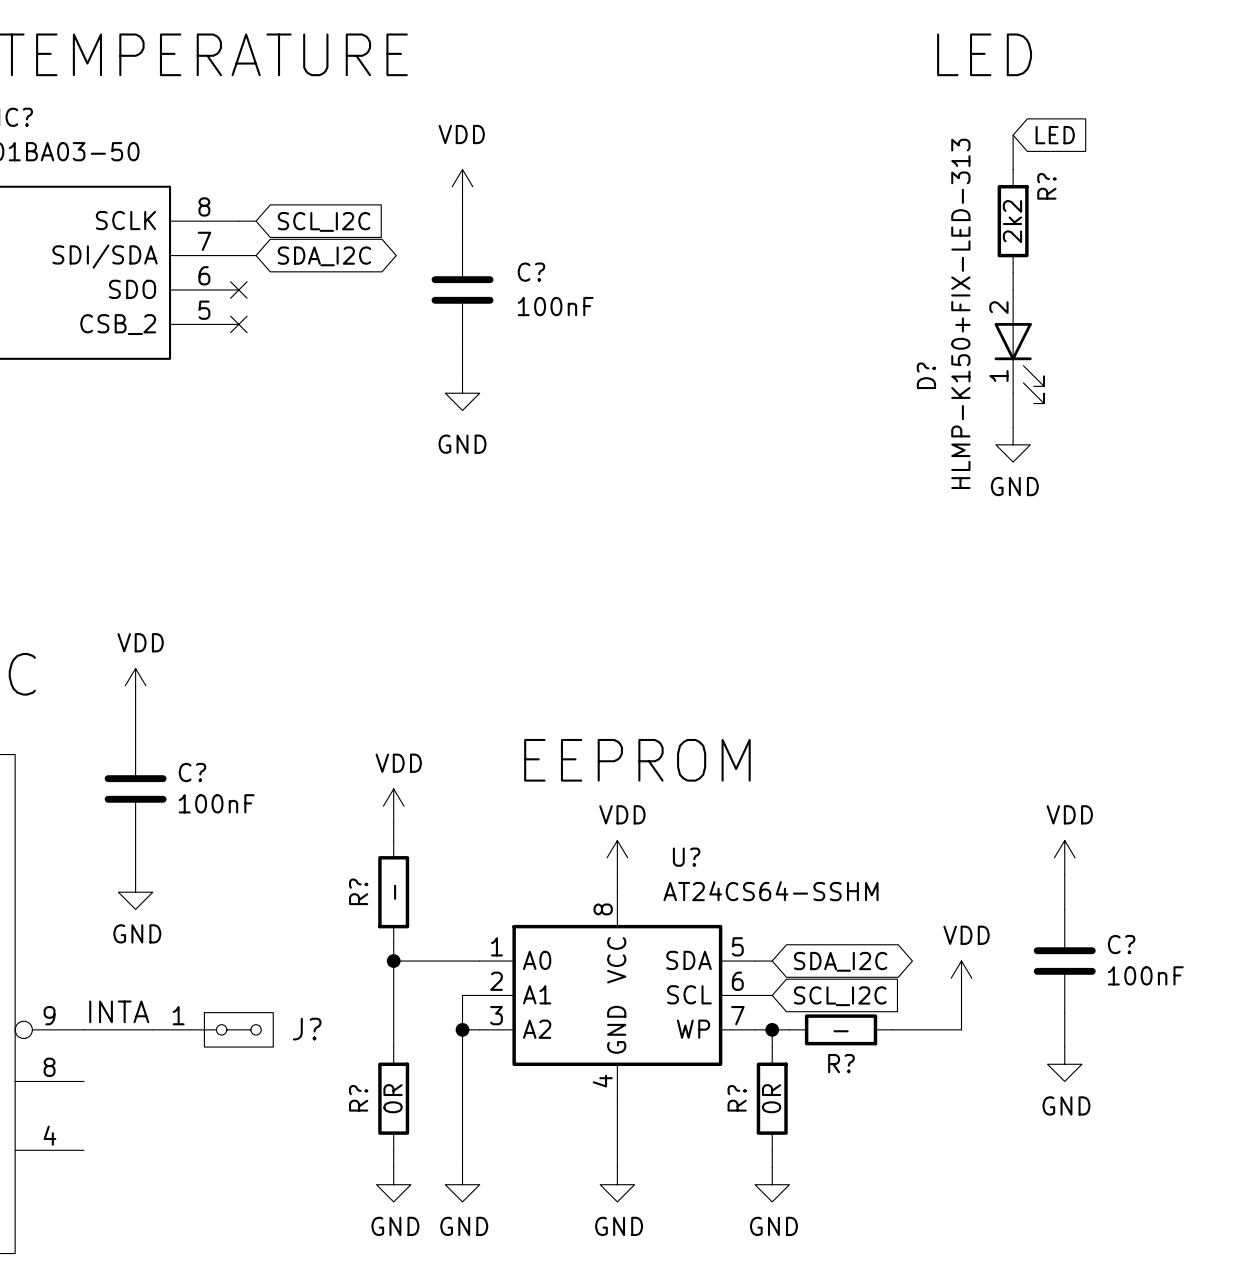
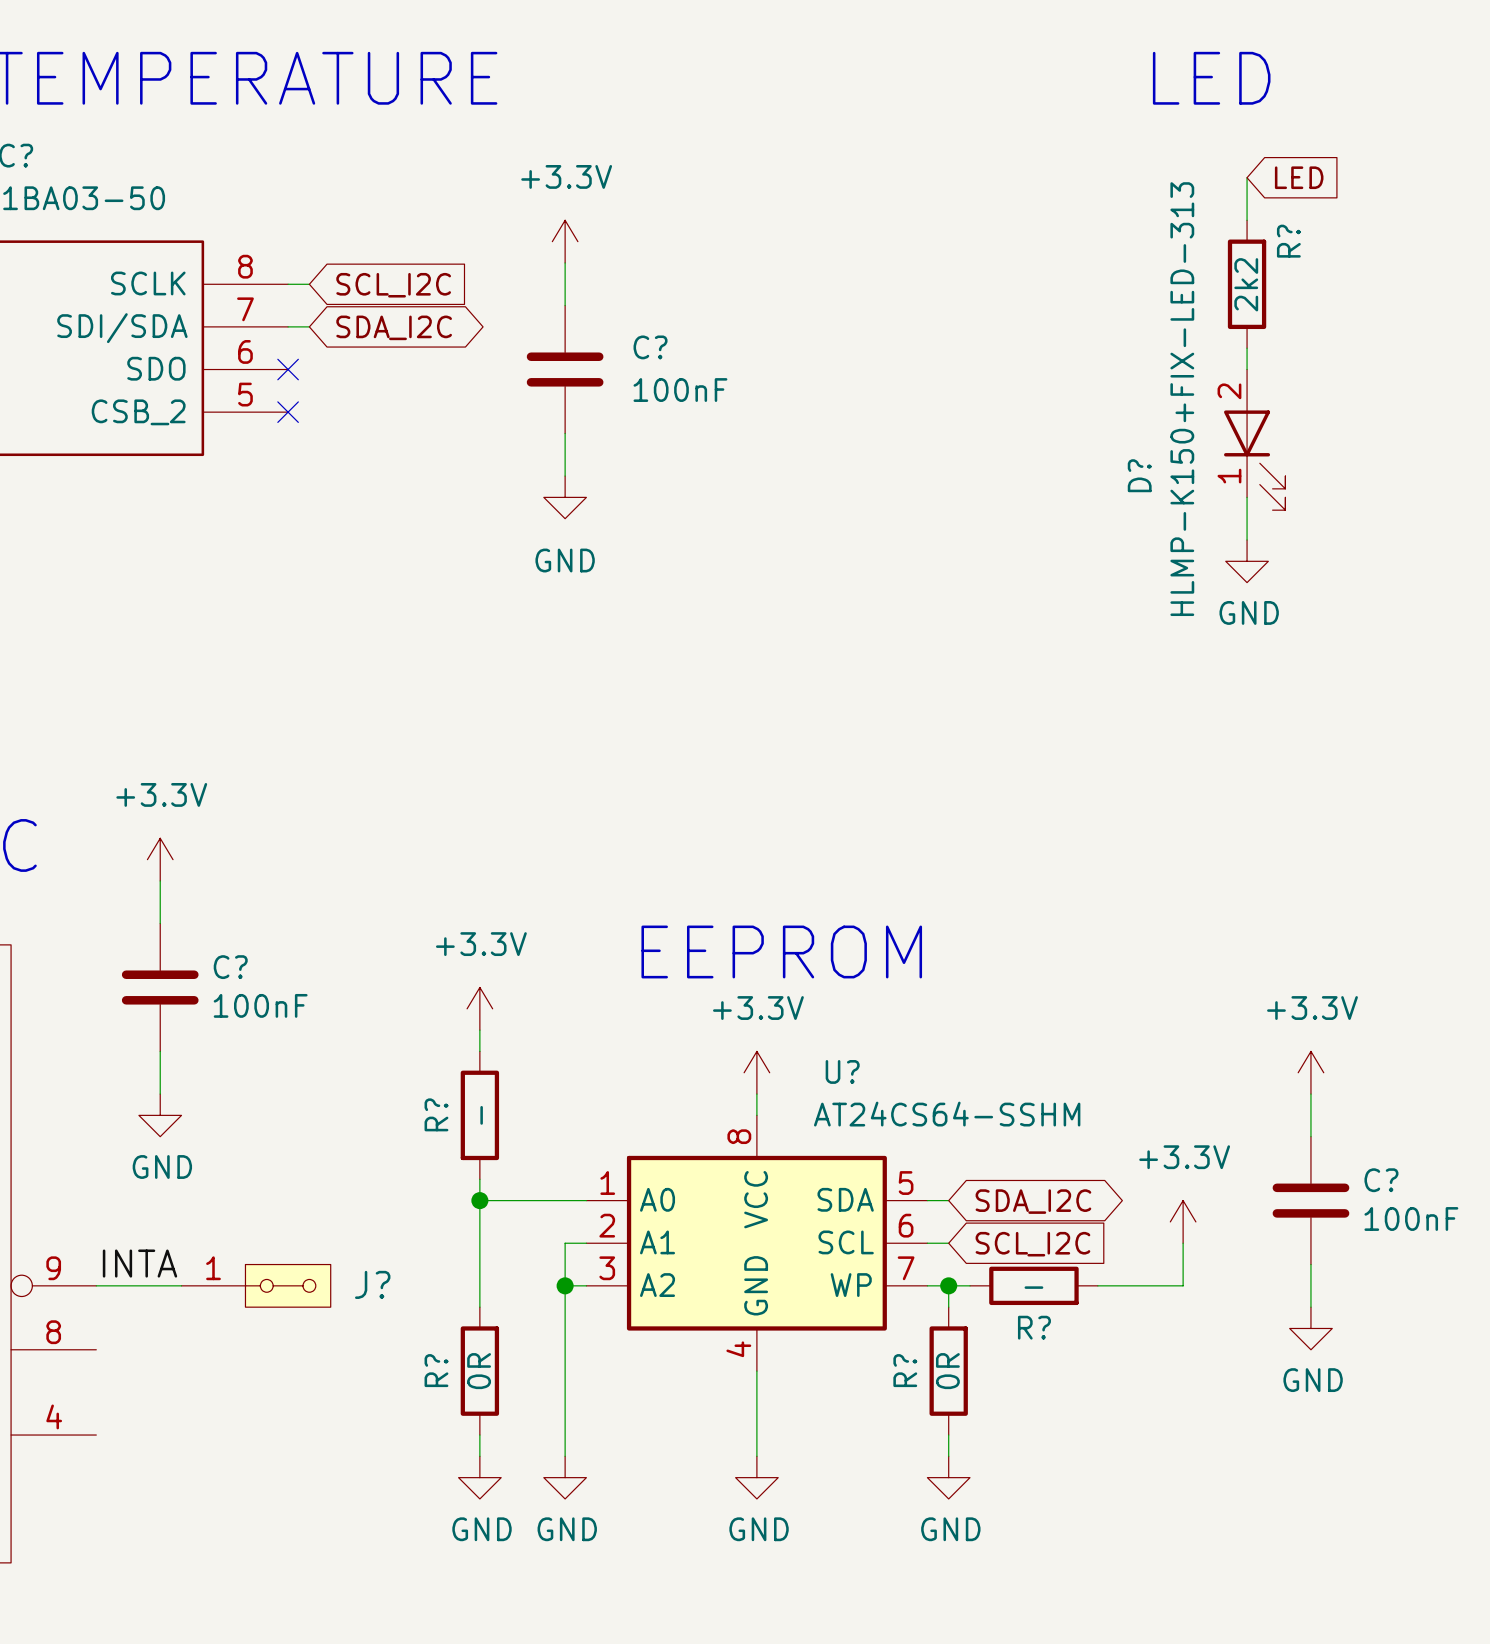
power symbol: VDD (462, 186) -> +3.3V (565, 241)
power symbol: VDD (135, 685) -> +3.3V (160, 859)
power symbol: VDD (393, 806) -> +3.3V (479, 1008)
power symbol: VDD (617, 857) -> +3.3V (756, 1072)
power symbol: VDD (1064, 857) -> +3.3V (1310, 1072)
power symbol: VDD (961, 978) -> +3.3V (1183, 1221)

